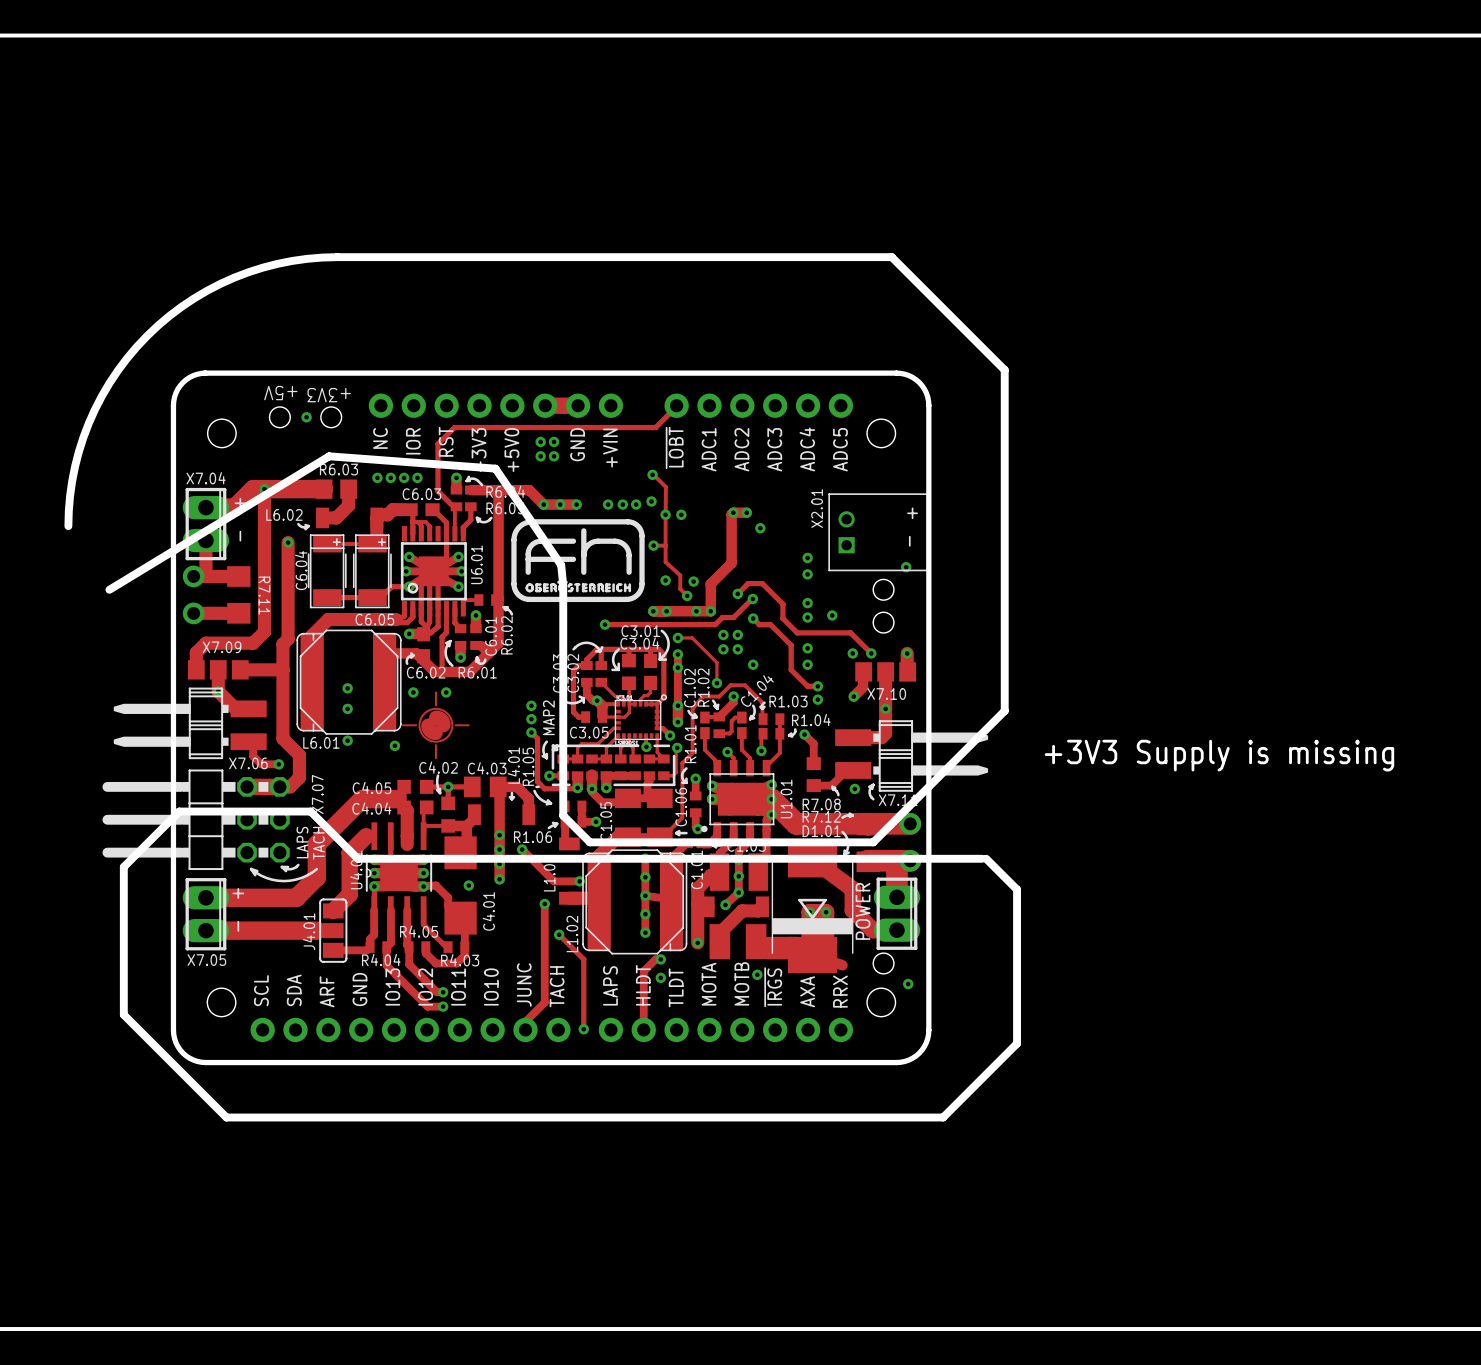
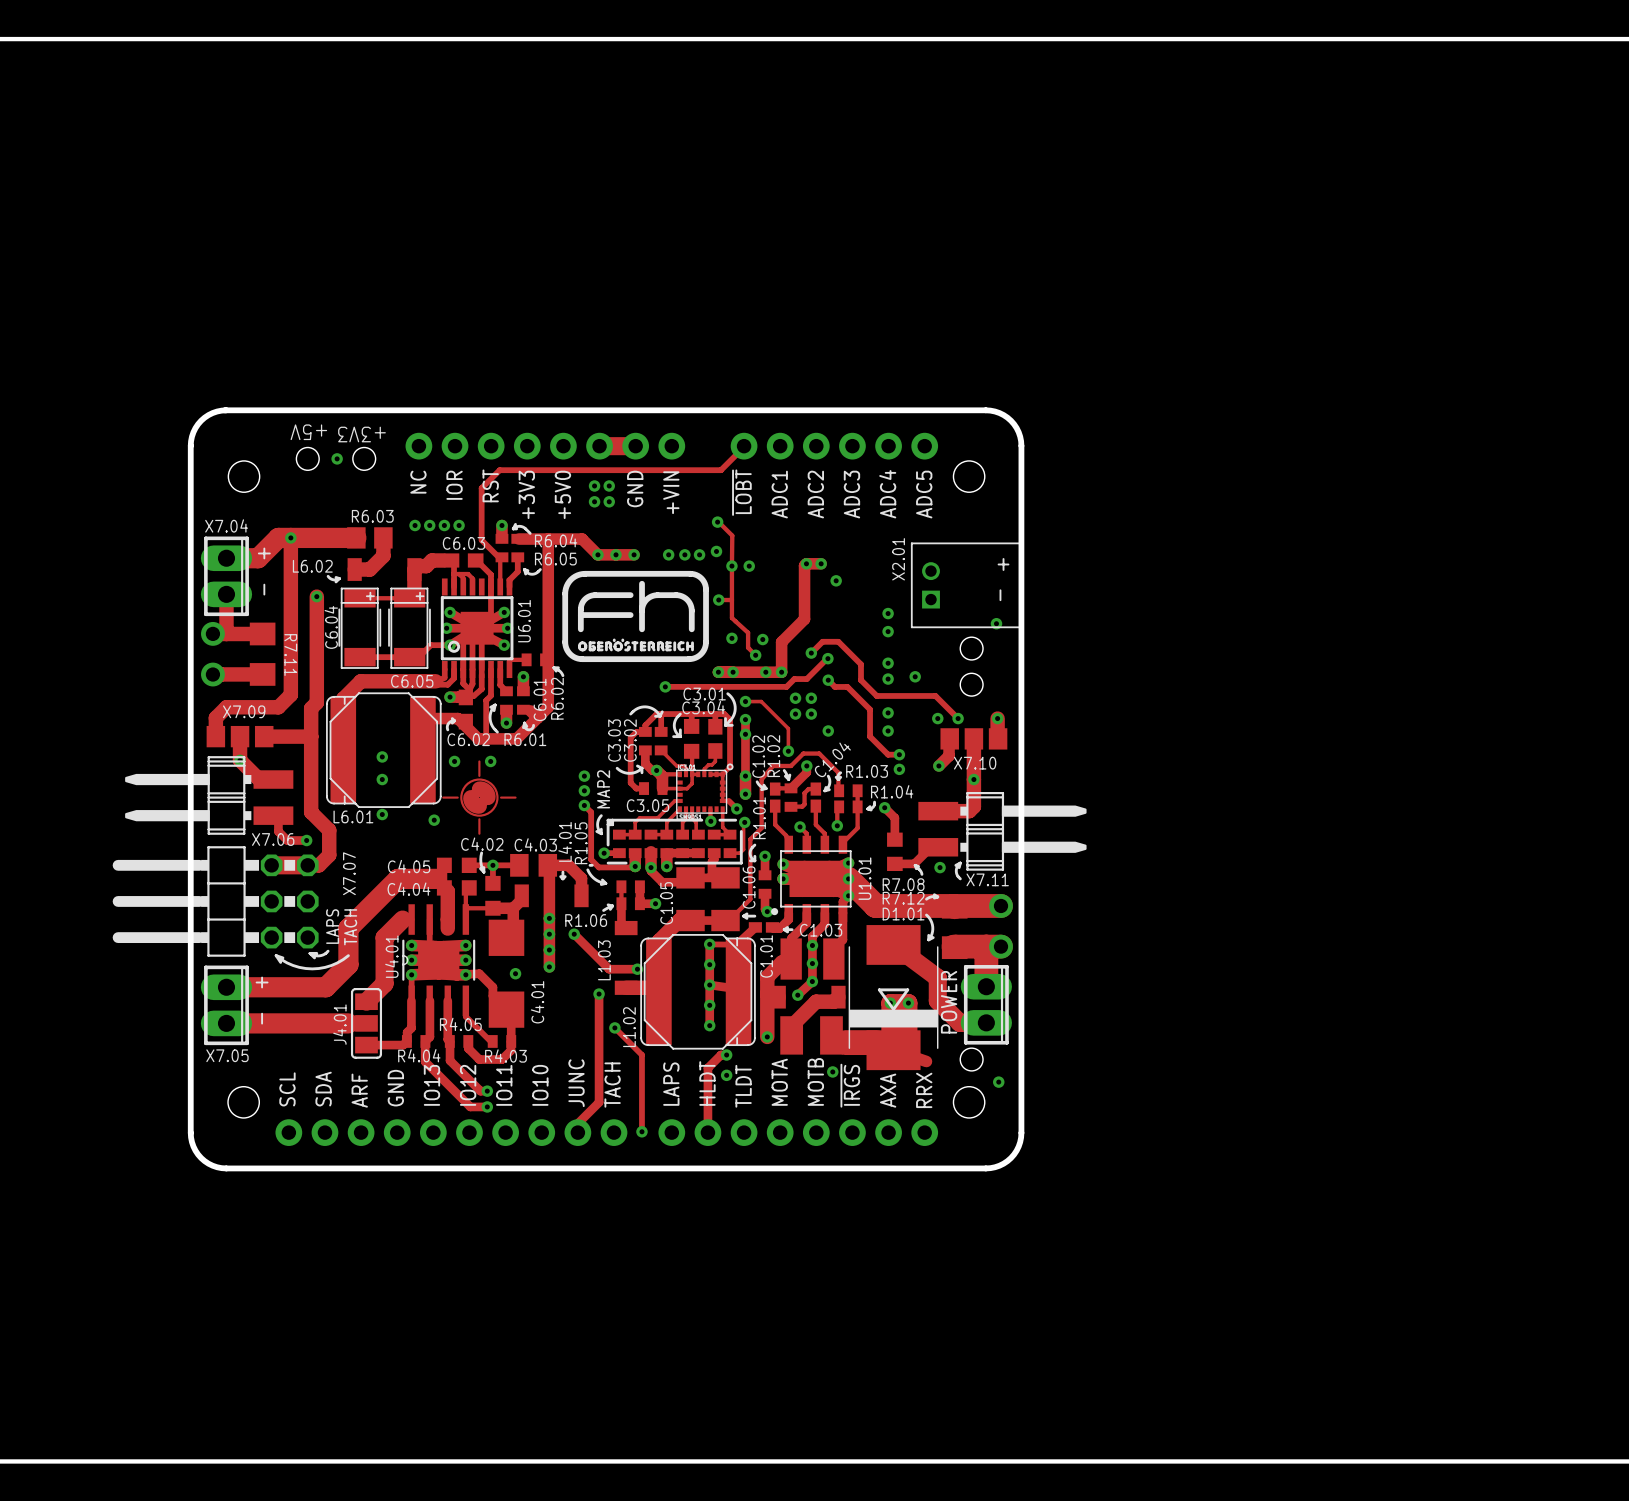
board edge: (68, 526) (72, 481) (83, 437) (101, 396) (118, 370) (136, 346) (169, 315) (207, 290) (248, 272) (292, 260) (337, 257) (891, 257) (1004, 370) (1004, 710) (873, 842) (589, 842) (563, 815) (563, 585) (561, 565) (495, 468) (329, 456) (109, 589) -> none
text: +3V3 Supply is missing (1219, 755) -> none
board edge: (982, 858) (357, 858) (310, 811) (179, 811) (123, 866) (123, 1014) (226, 1117) (943, 1117) (1017, 1043) (1017, 889) (986, 858) -> none

